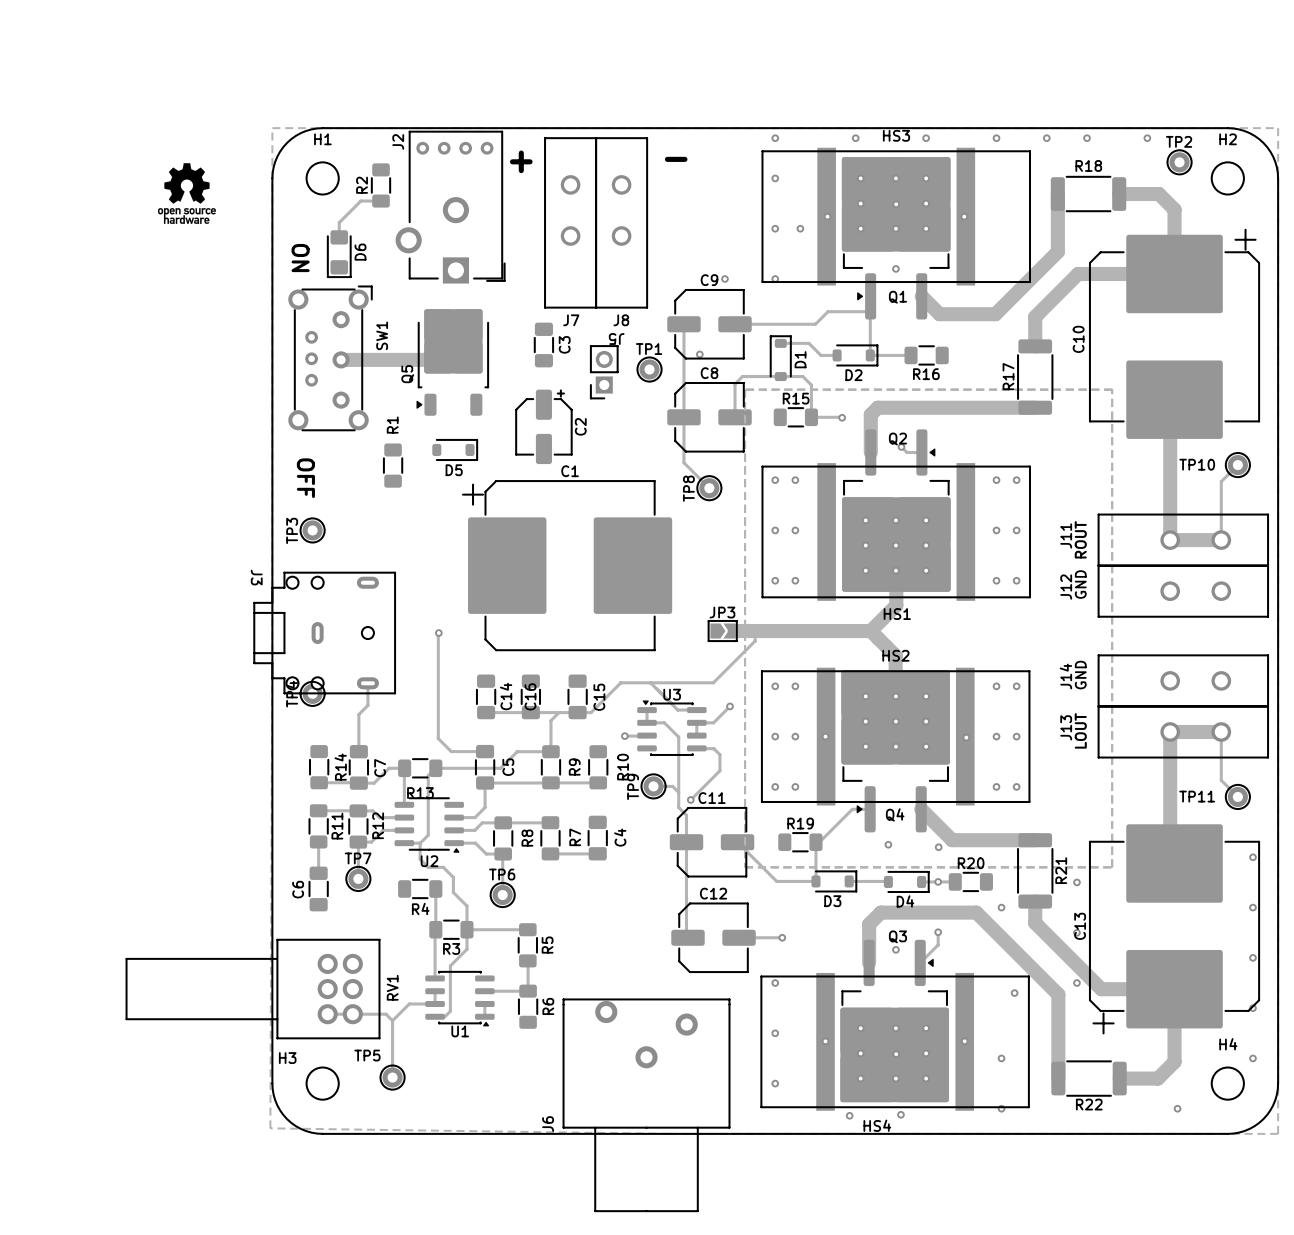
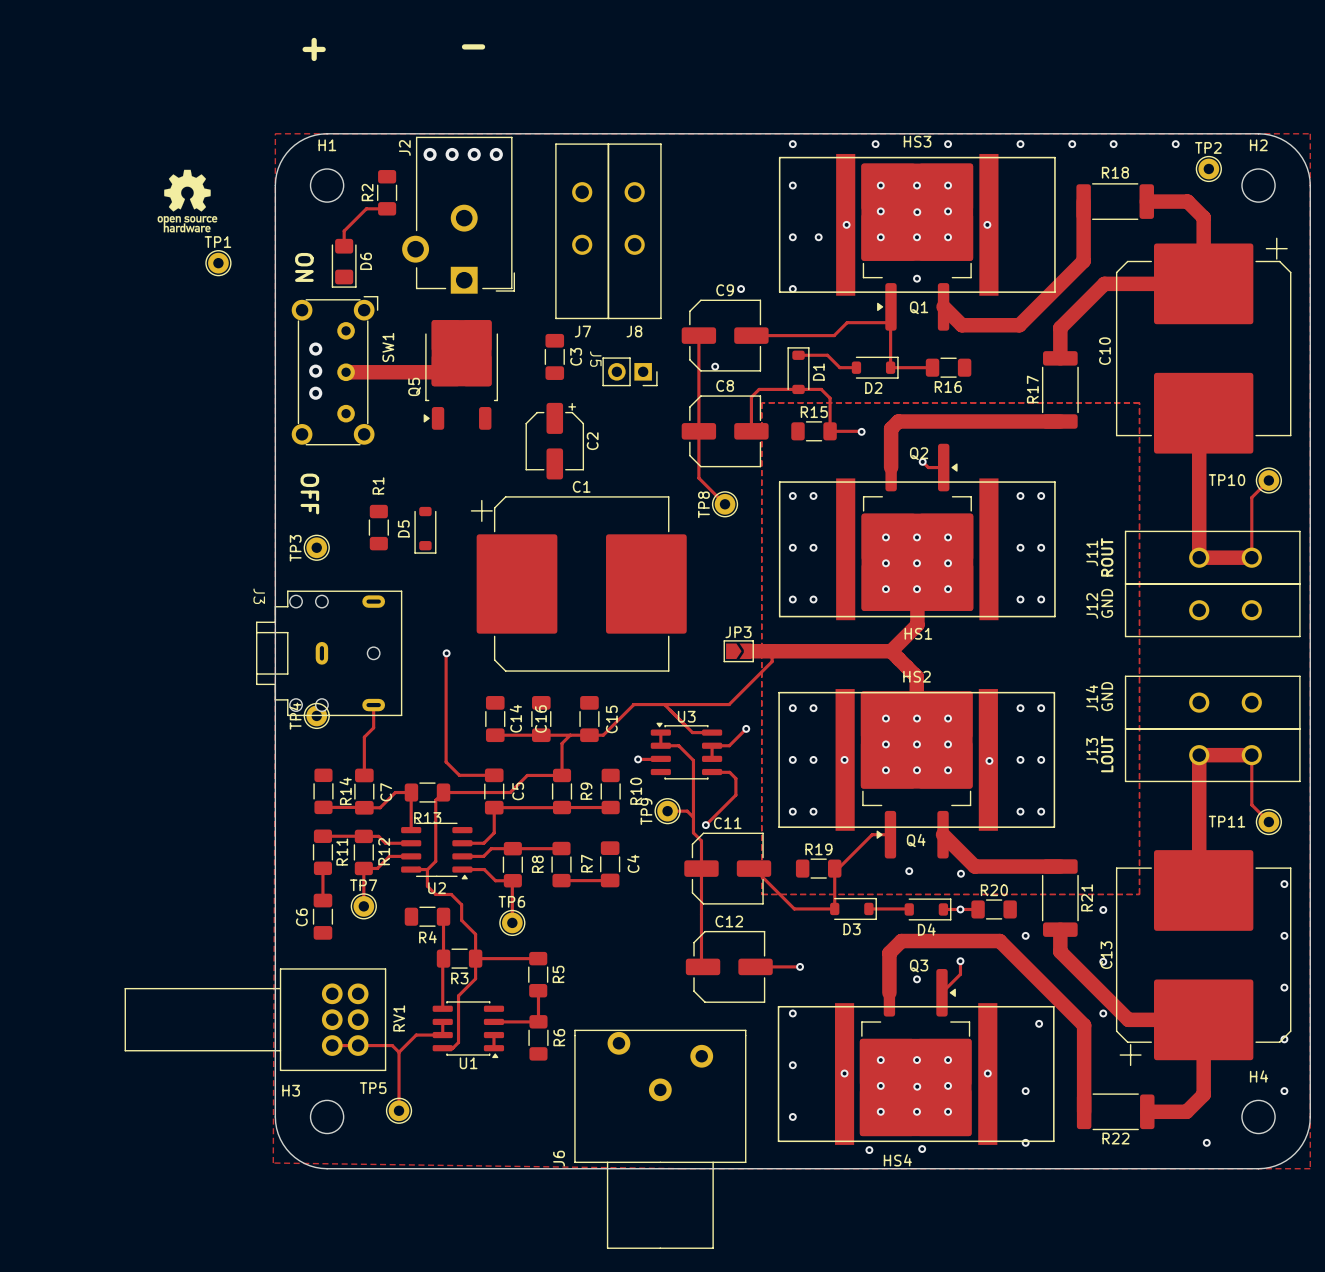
text position: - (676, 159) -> - (473, 46)
text position: + (521, 161) -> + (314, 49)
TP1 position: (649, 369) -> (218, 263)
J5 rotation: 0° (604, 372) -> 90° counterclockwise (630, 371)
D5 rotation: 0° (455, 449) -> 90° clockwise (425, 530)
D5 position: (455, 449) -> (425, 530)
R1 position: (393, 465) -> (378, 527)

